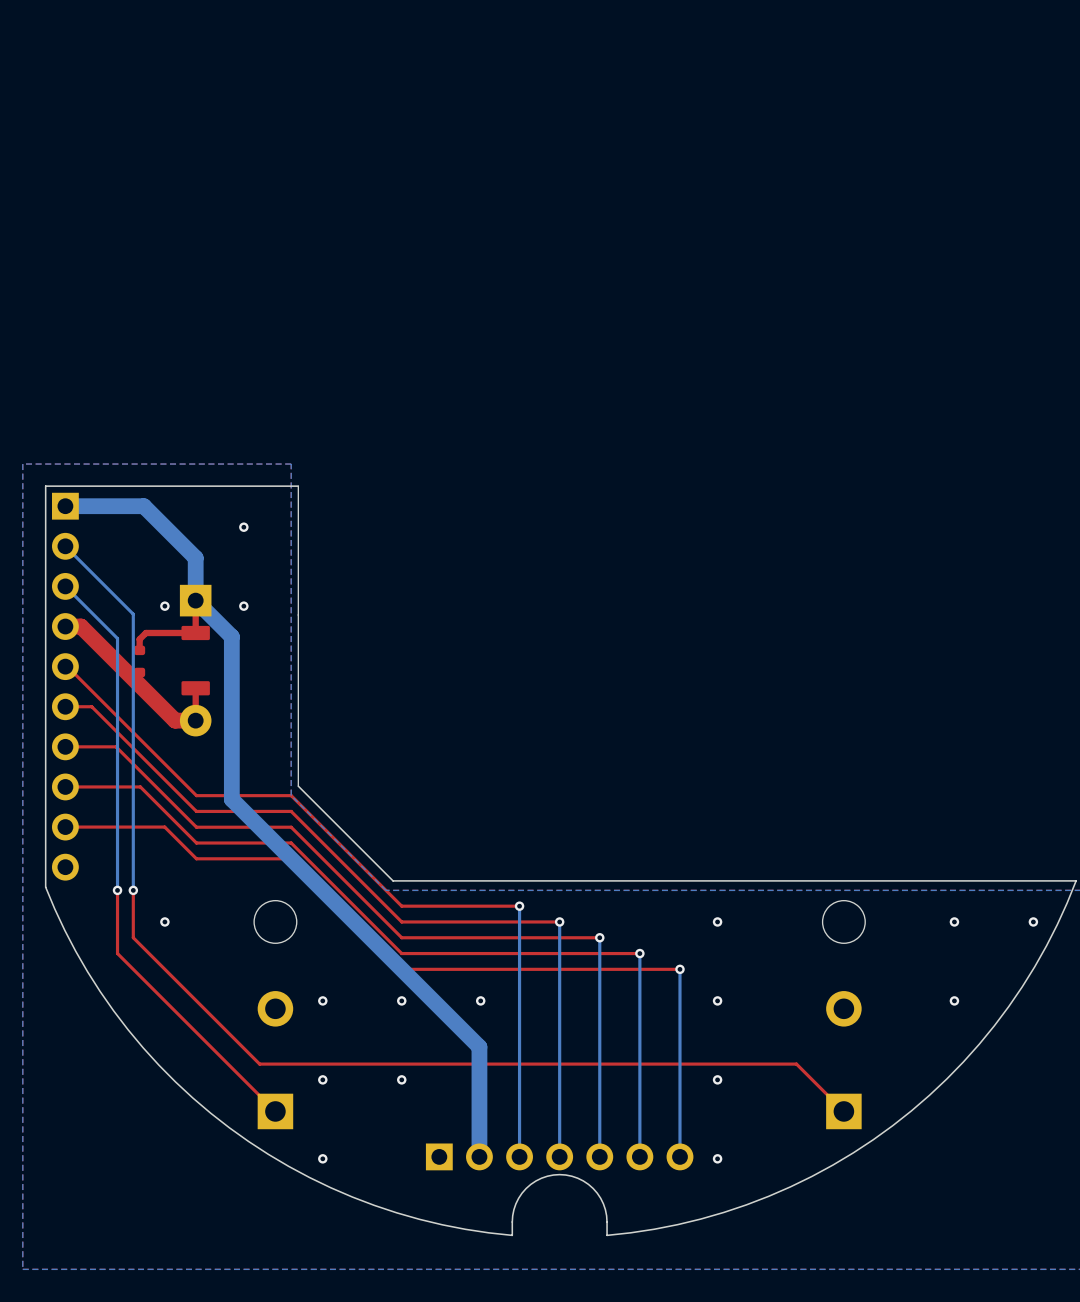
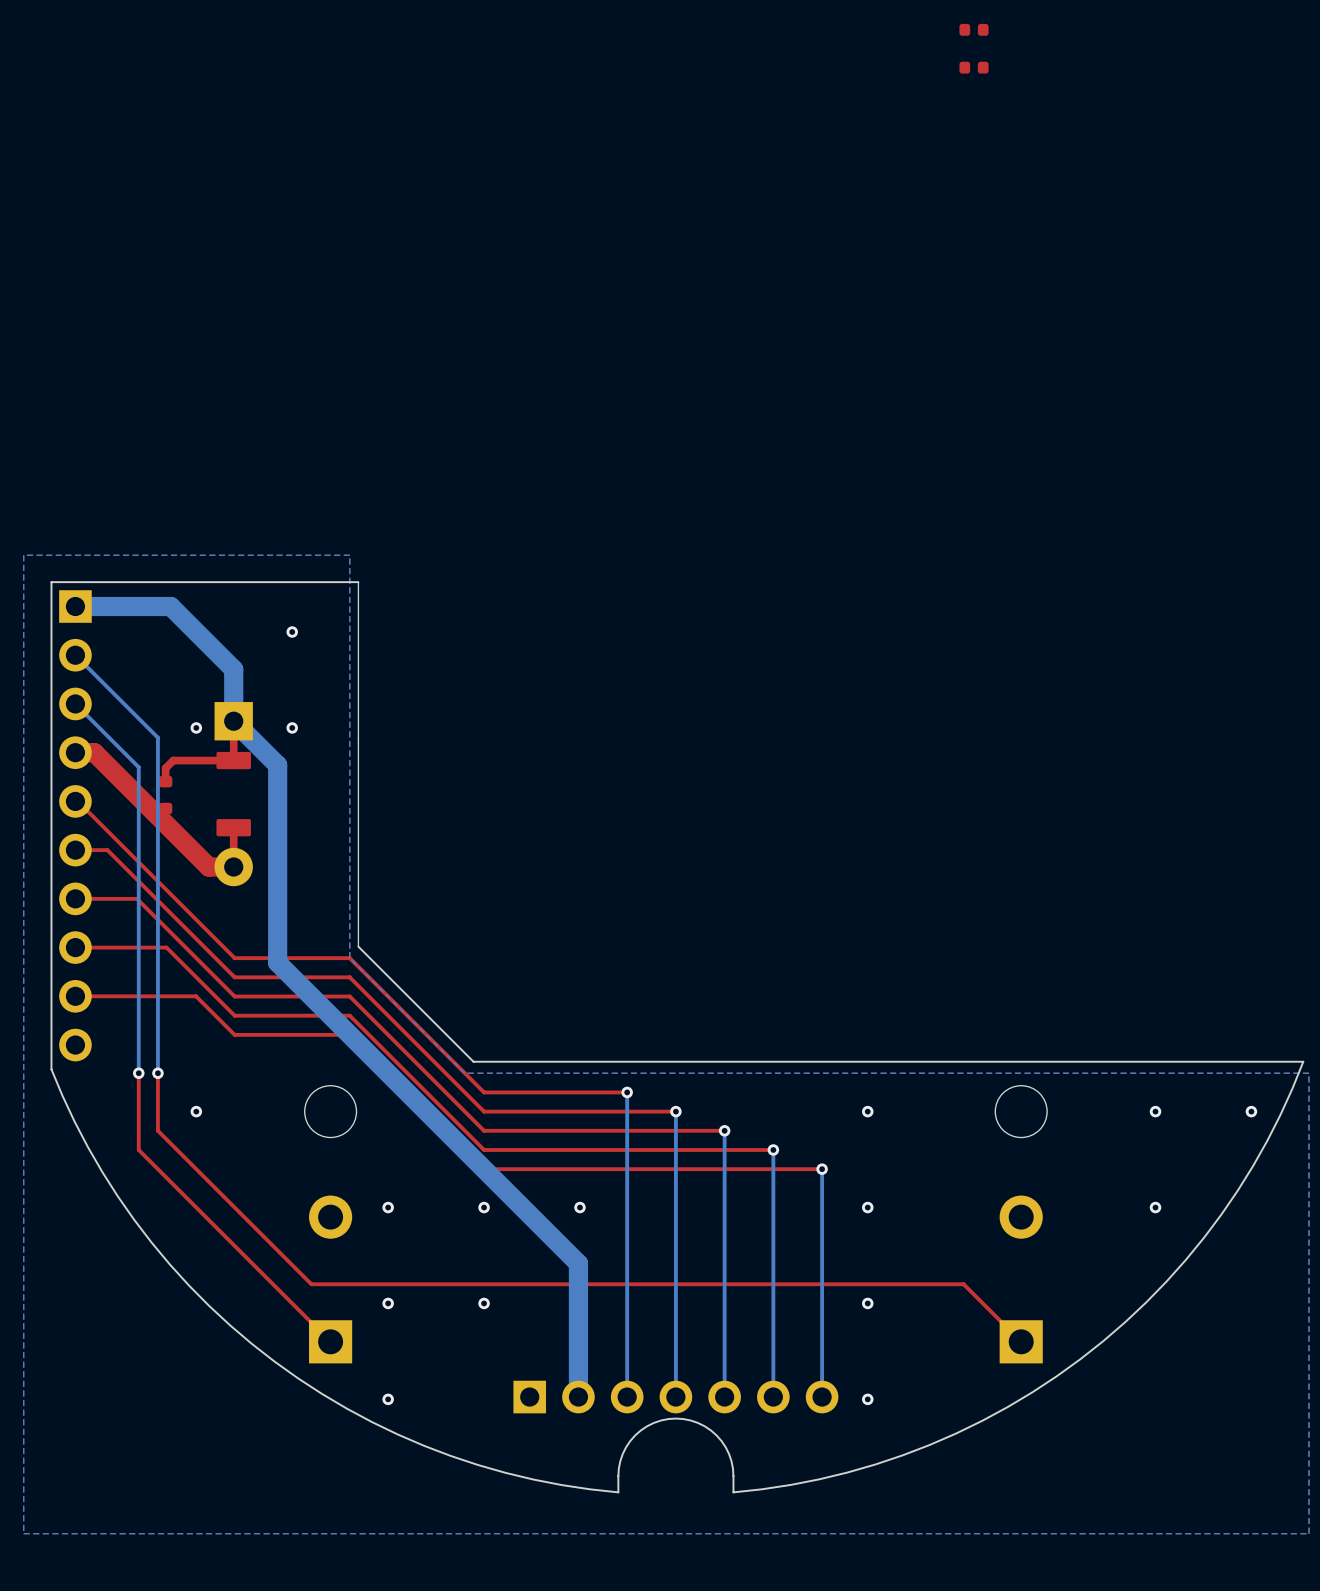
part: none -> (974, 29)
part: none -> (974, 67)

